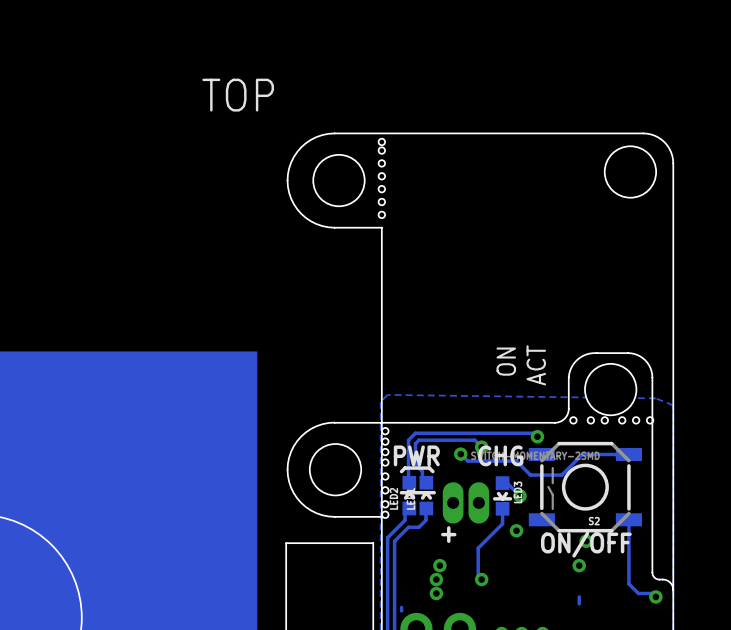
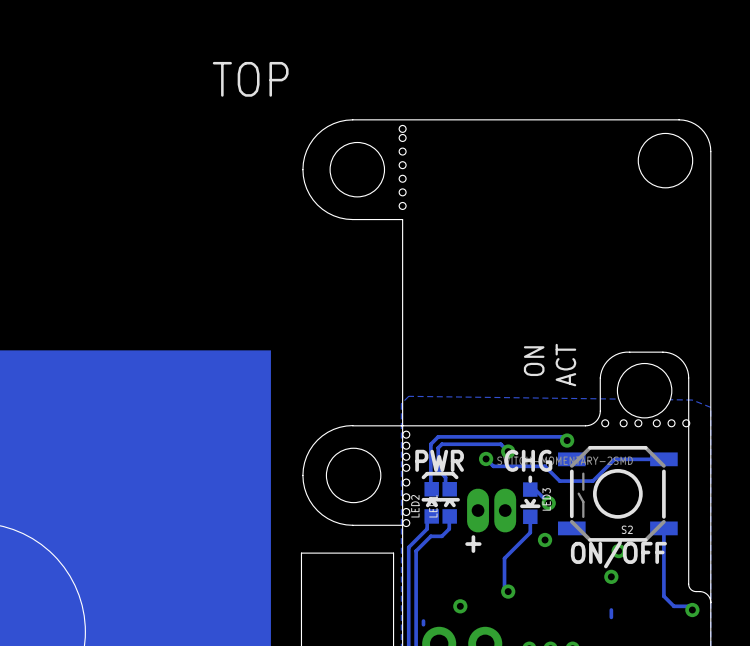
line: none -> (530, 477) (530, 481)
via: (439, 565) -> none
via: (436, 579) -> none

